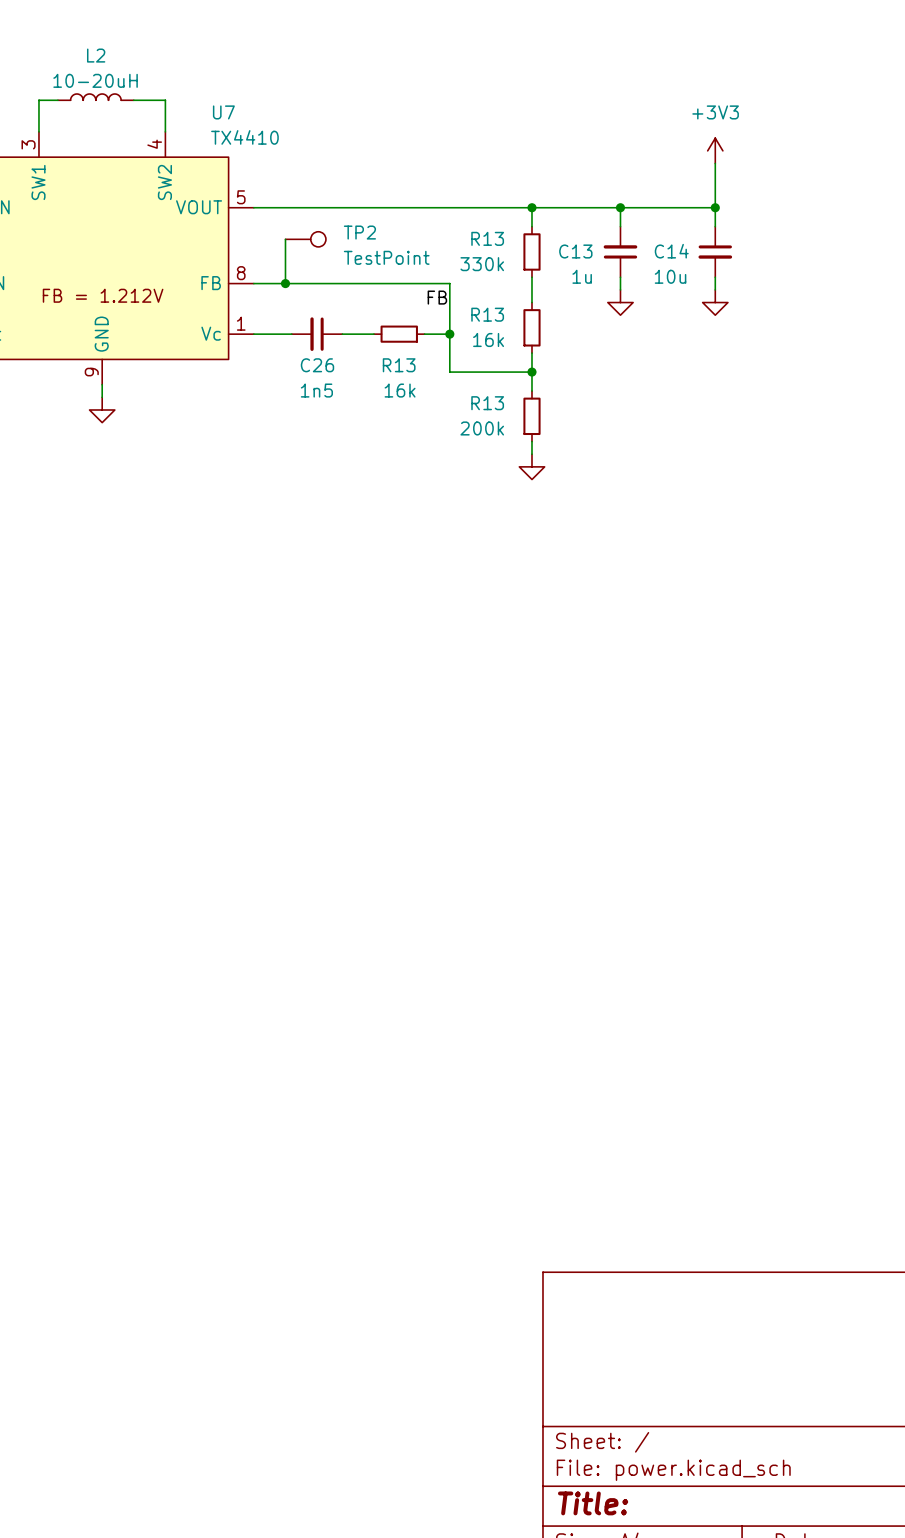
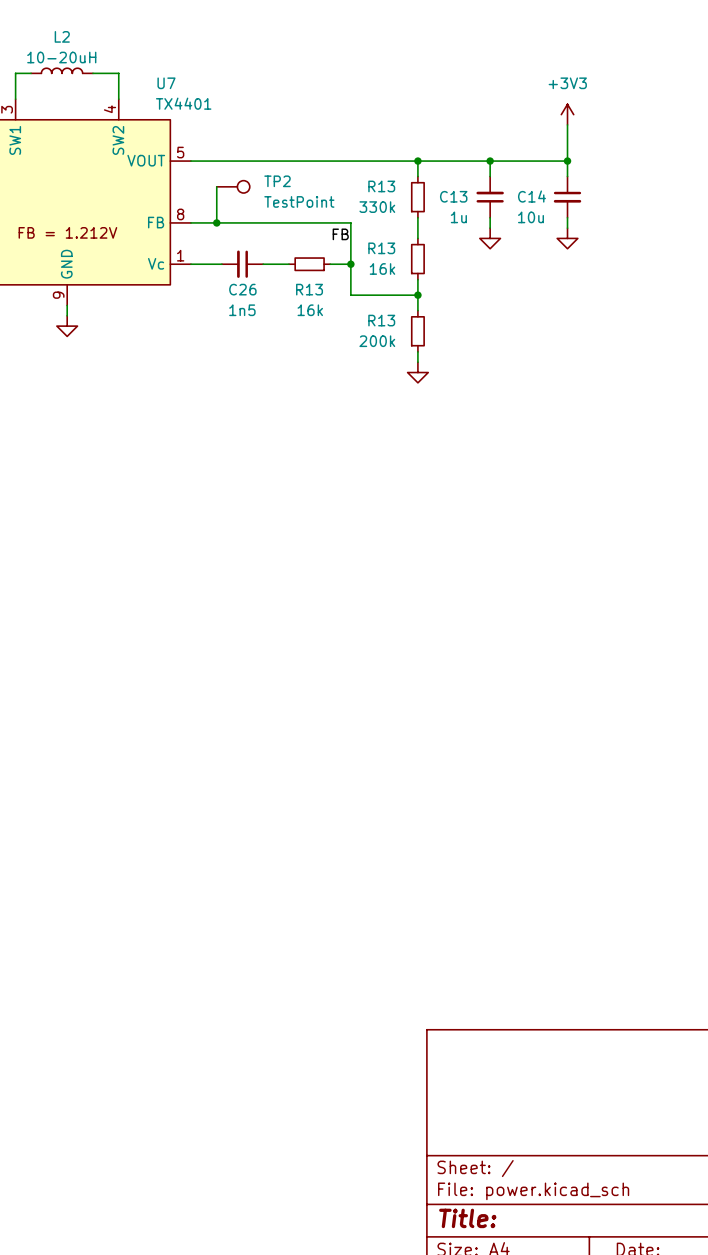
U7 value: TX4410 (244, 137) -> TX4401 (183, 103)

